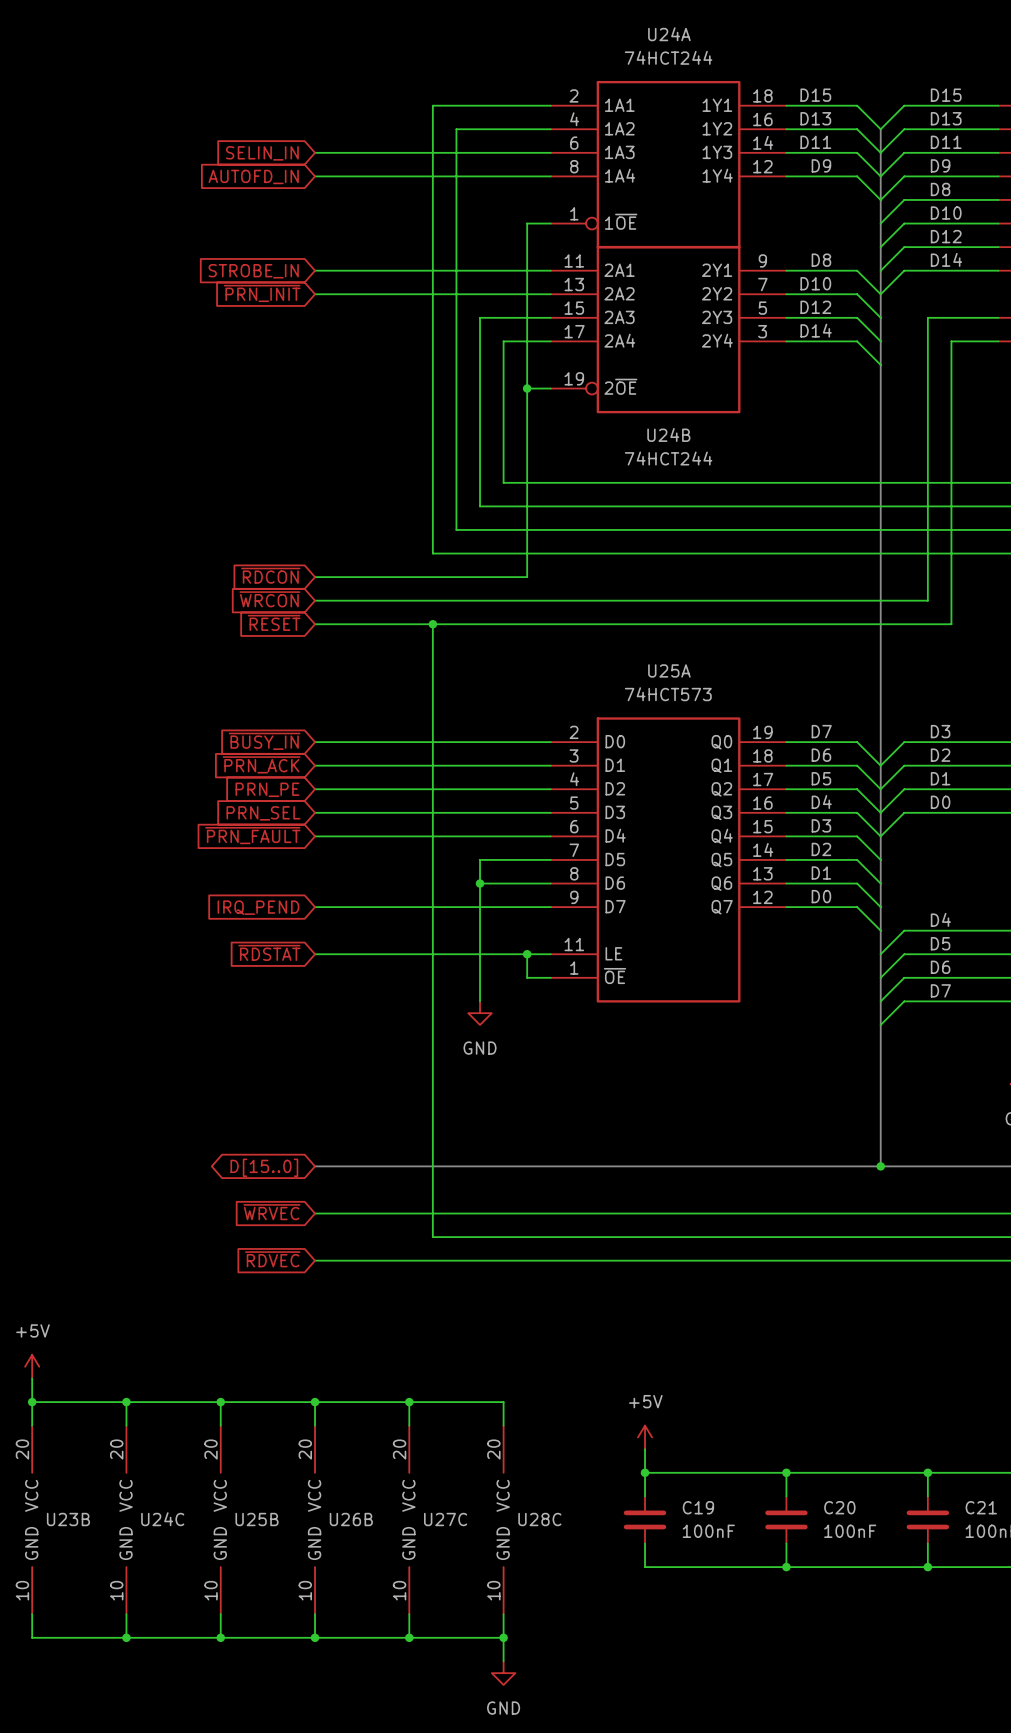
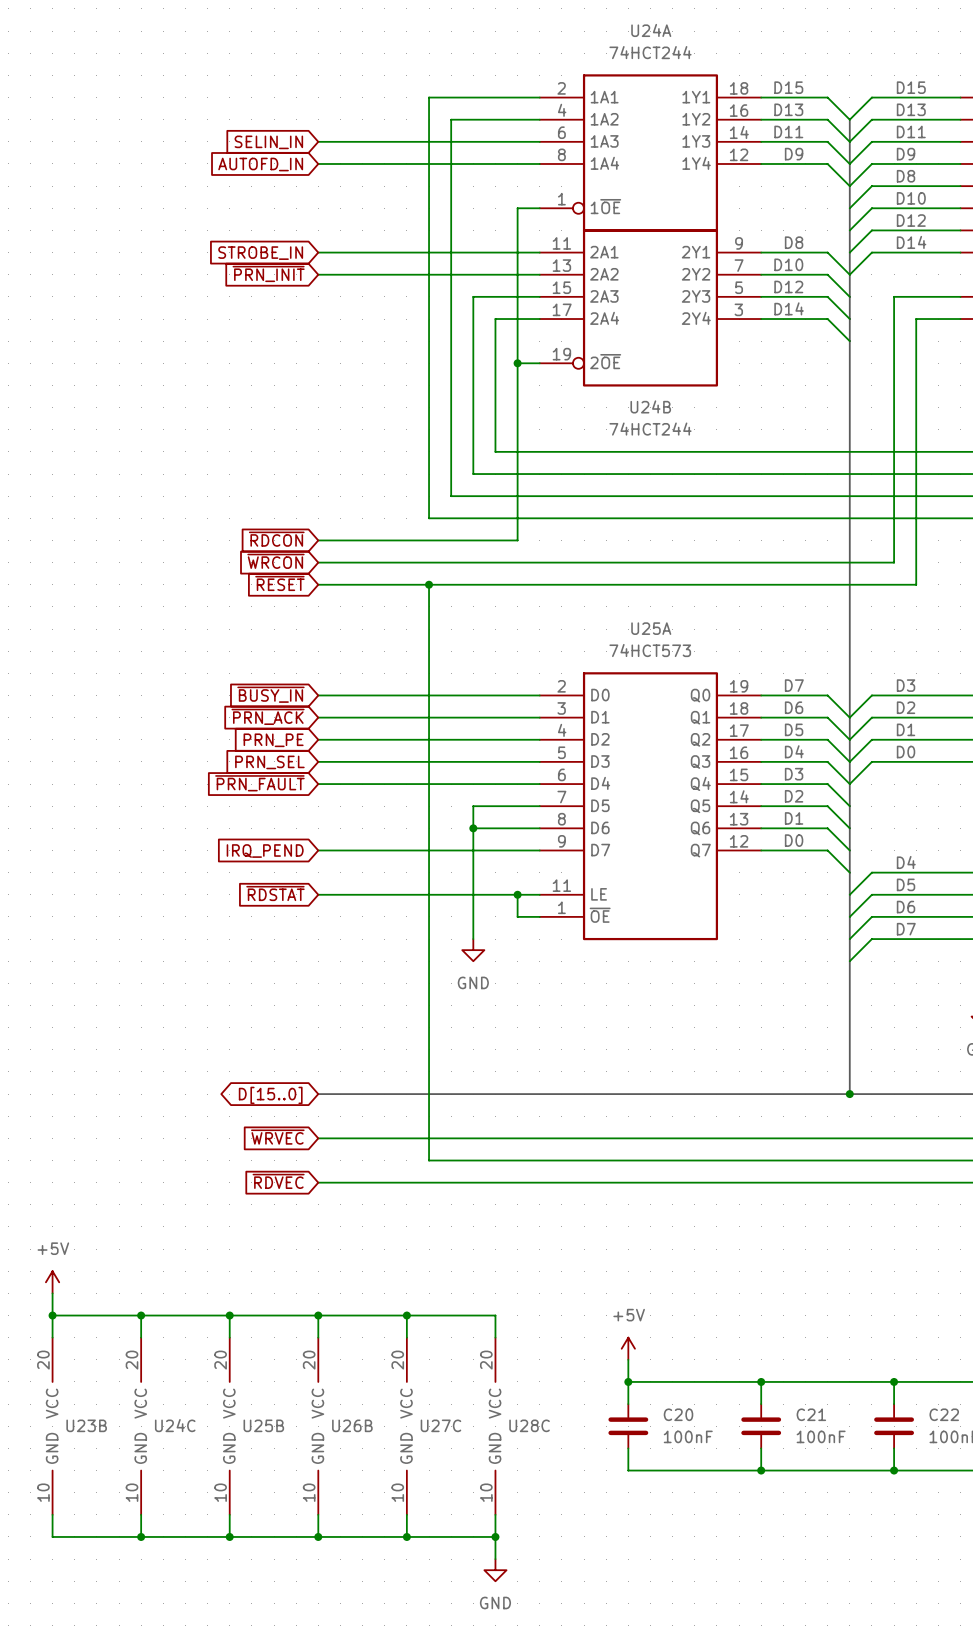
C19 name: C19 (698, 1507) -> C20 (678, 1414)
C20 name: C20 (839, 1507) -> C21 (811, 1414)
C21 name: C21 (981, 1507) -> C22 (944, 1414)

